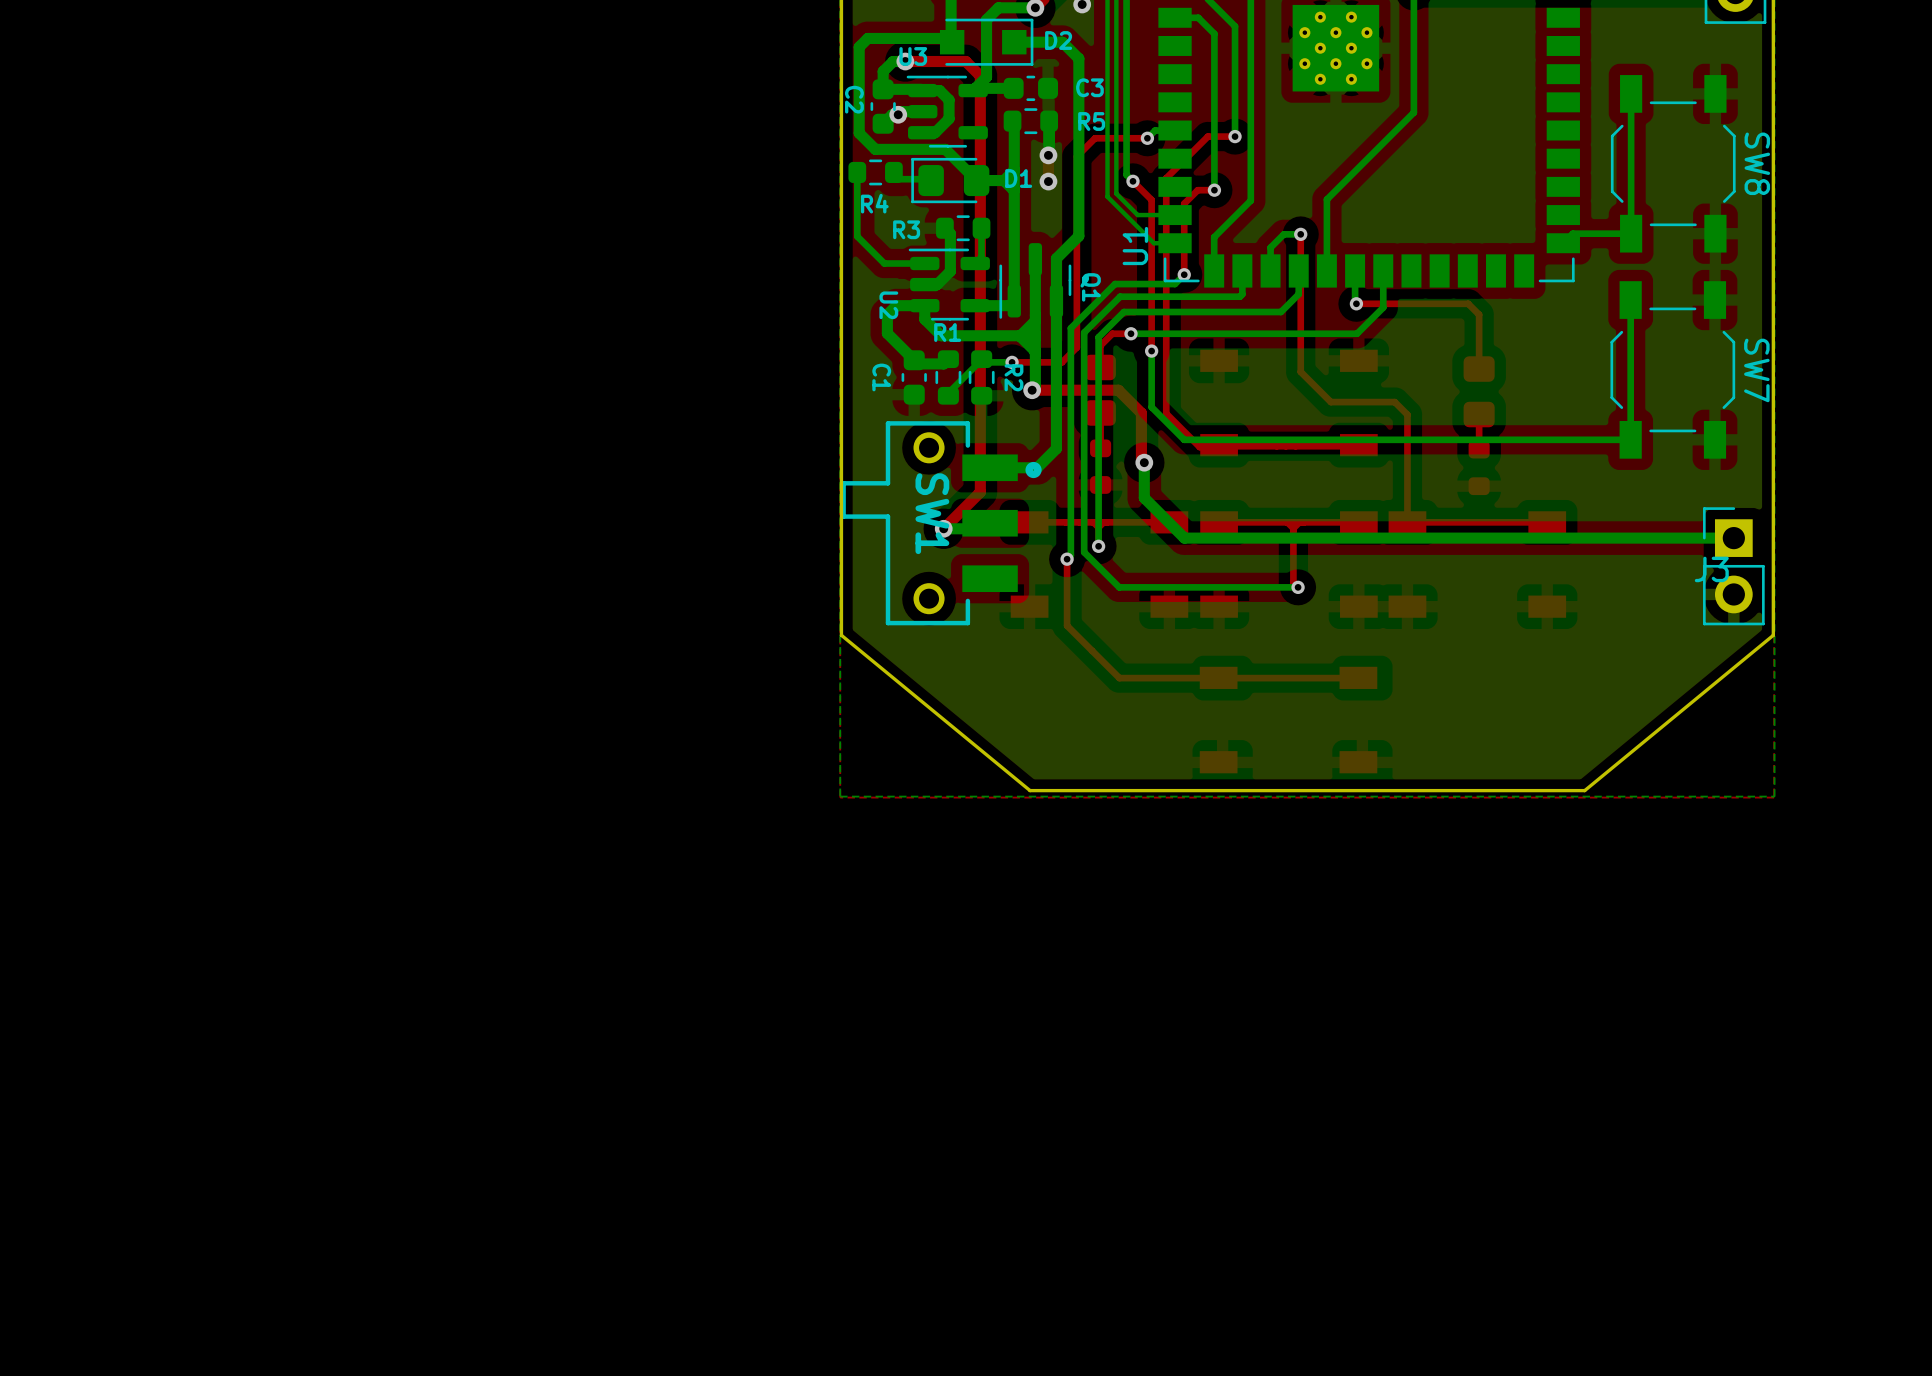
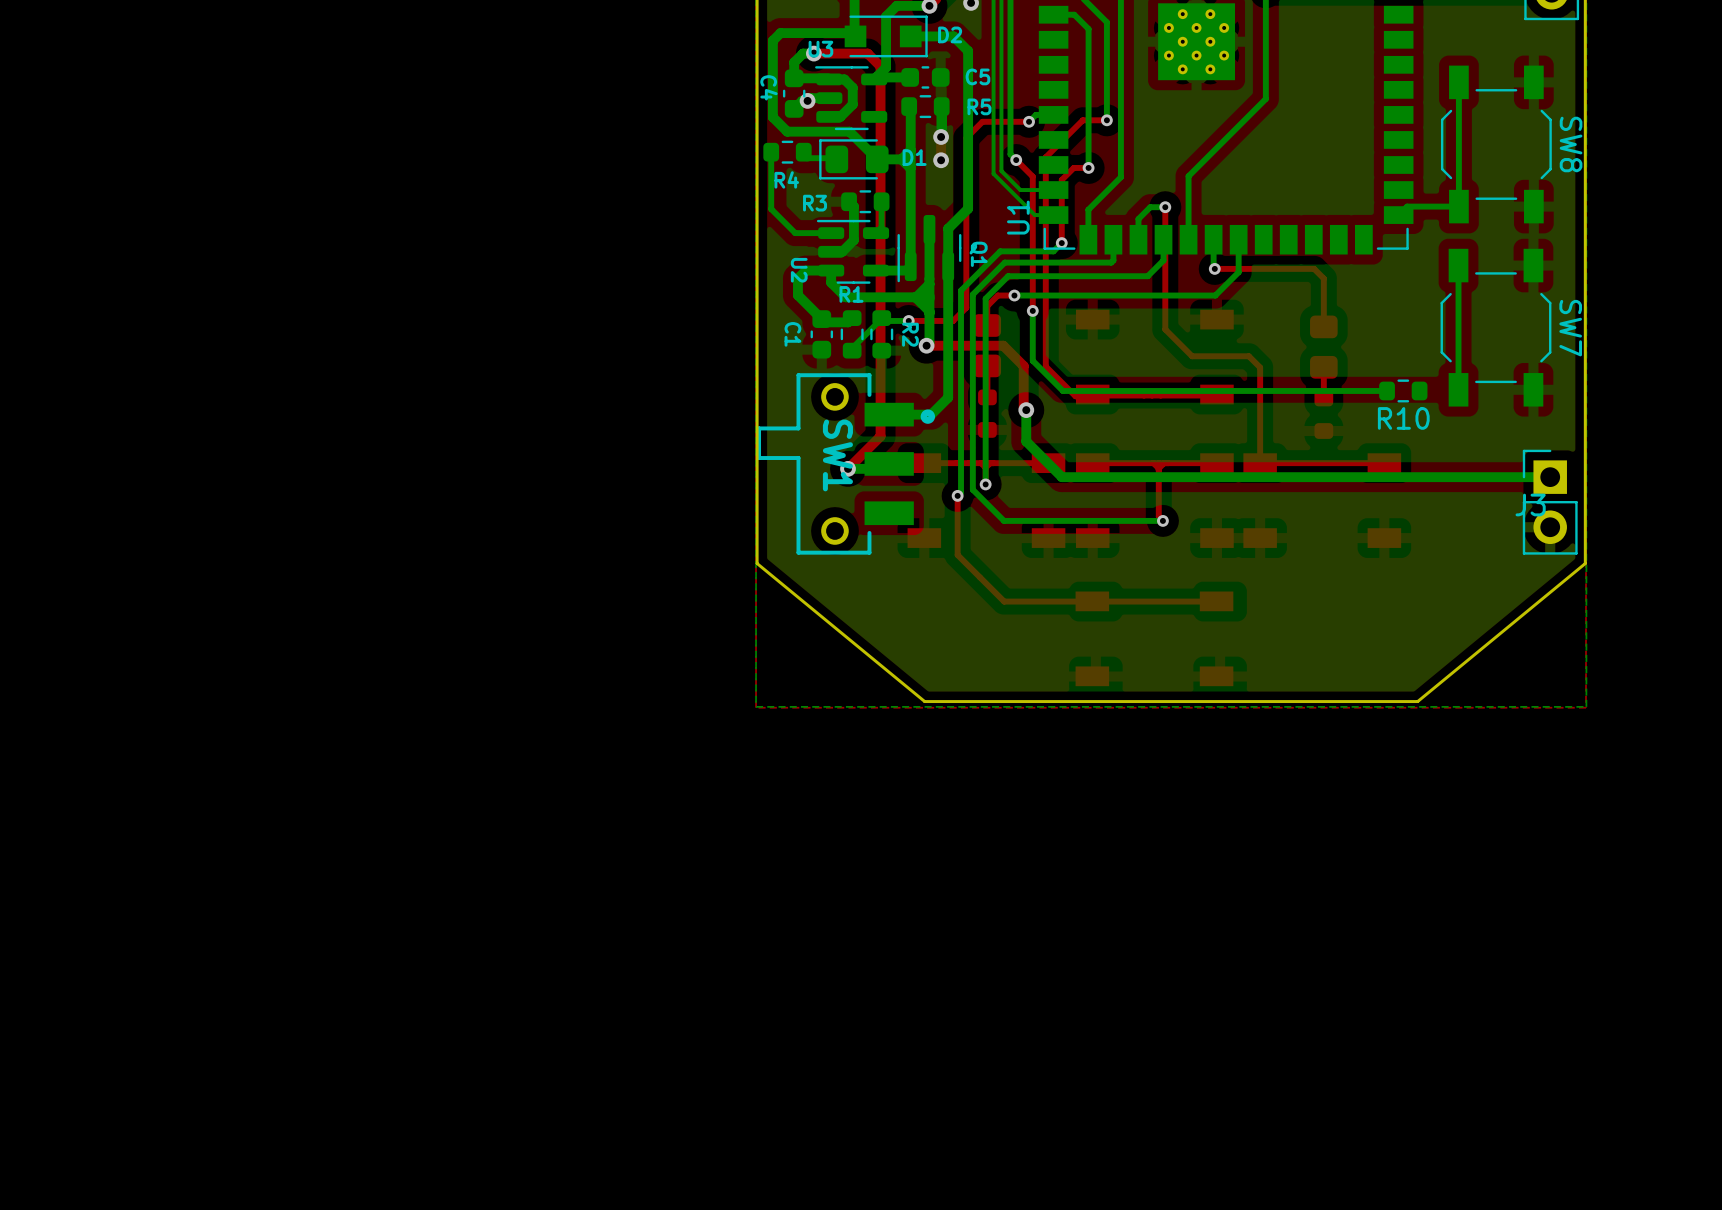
C3 name: C3 (1089, 87) -> C5 (977, 76)
C2 name: C2 (854, 99) -> C4 (769, 87)
bottom track: (1630, 439) (1184, 439) -> (1387, 390) (1061, 389)
R10: none -> (1403, 390)

